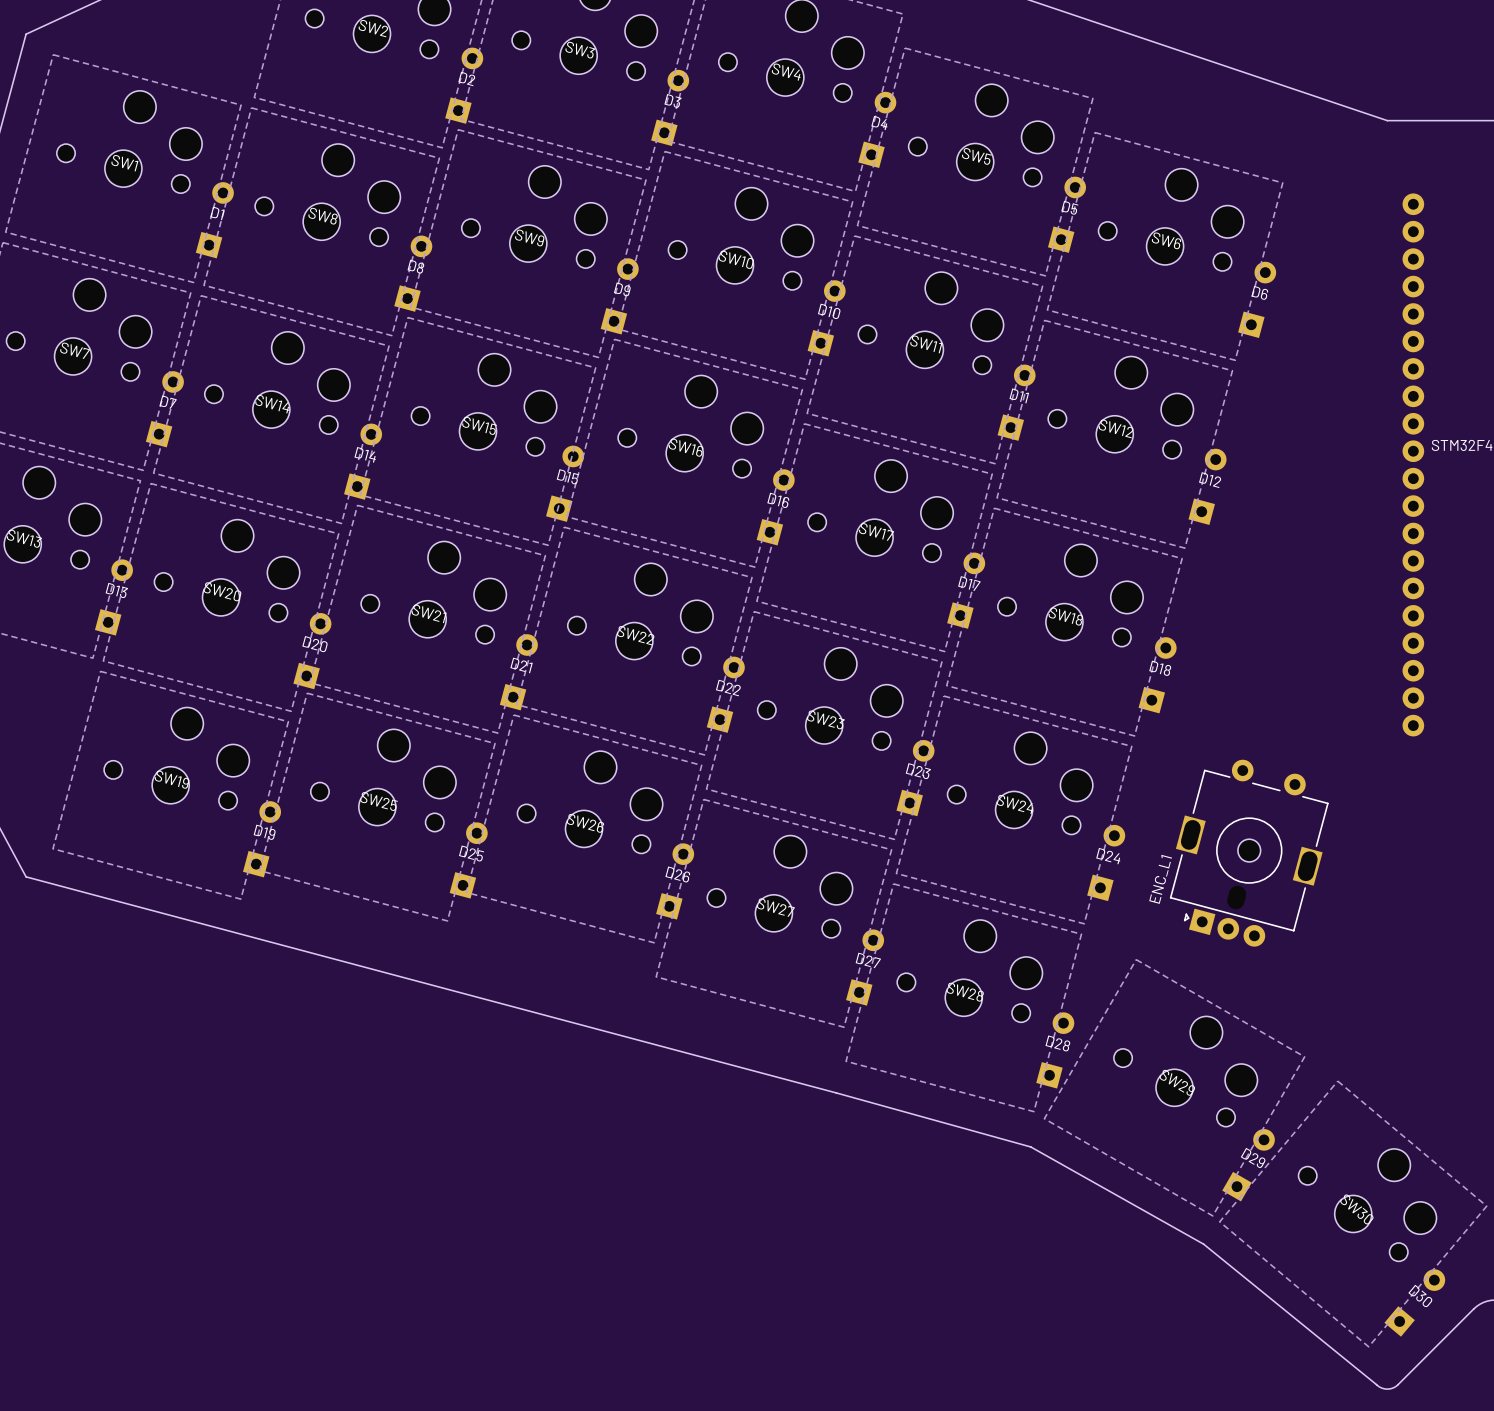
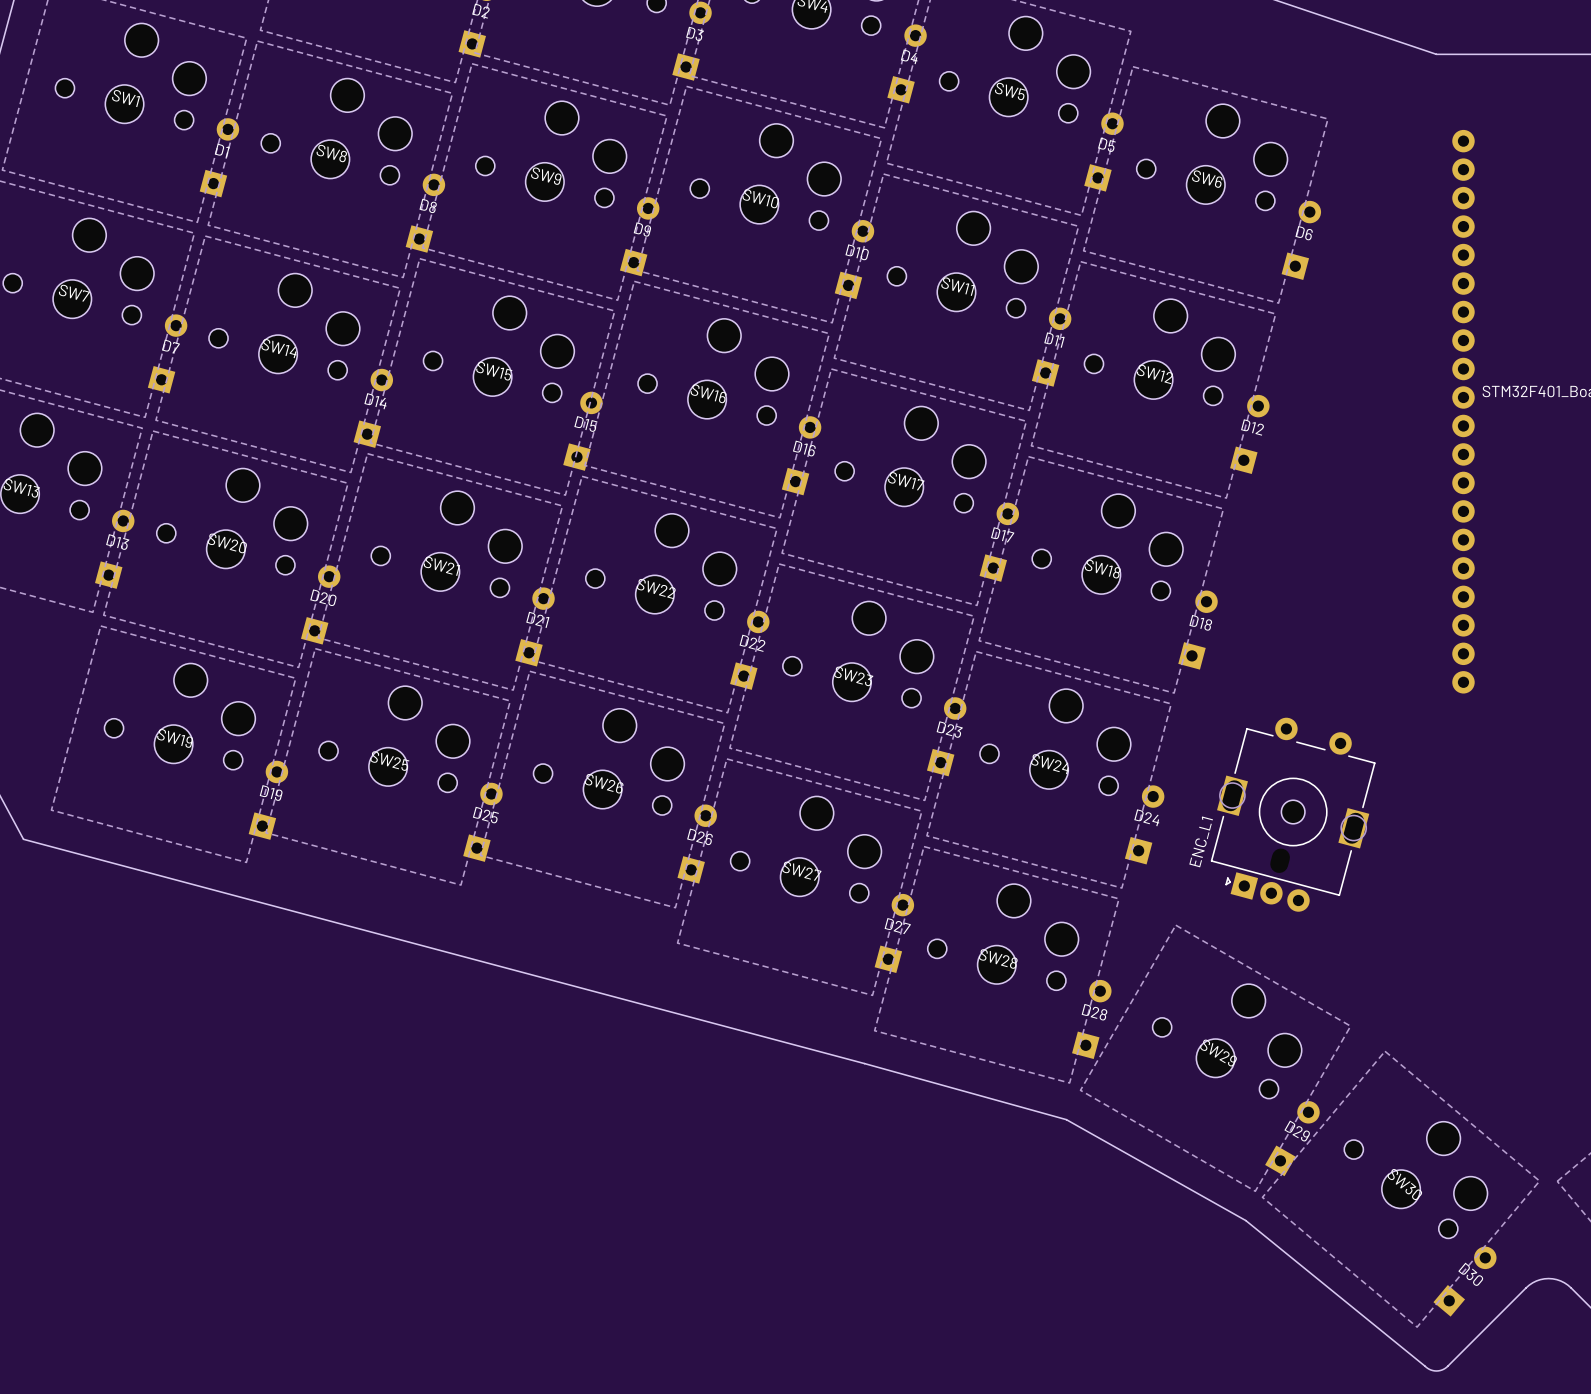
drawing: none -> [1219, 782, 1246, 809]
drawing: none -> [1340, 814, 1367, 842]

